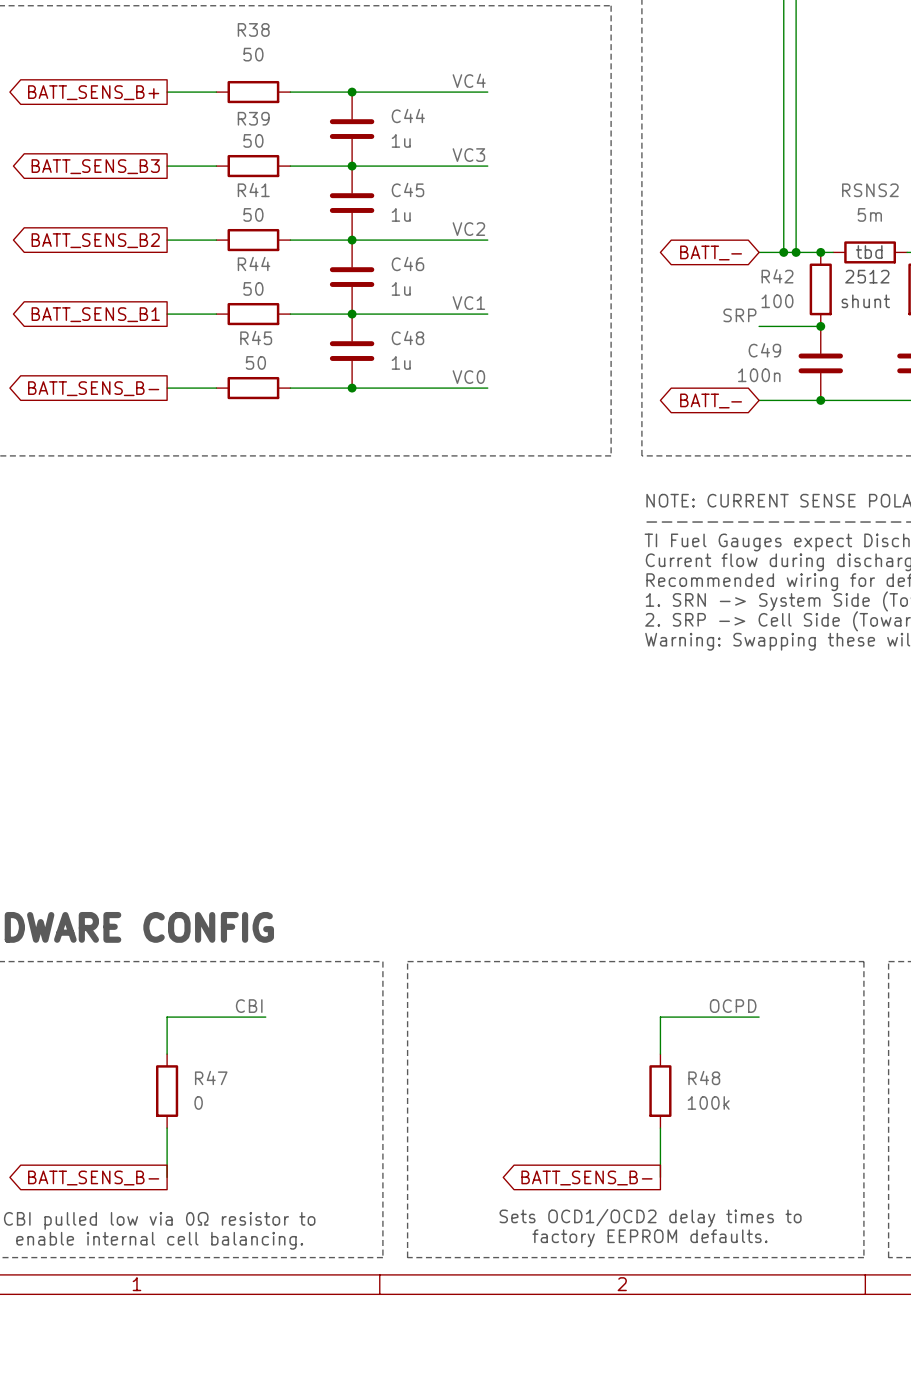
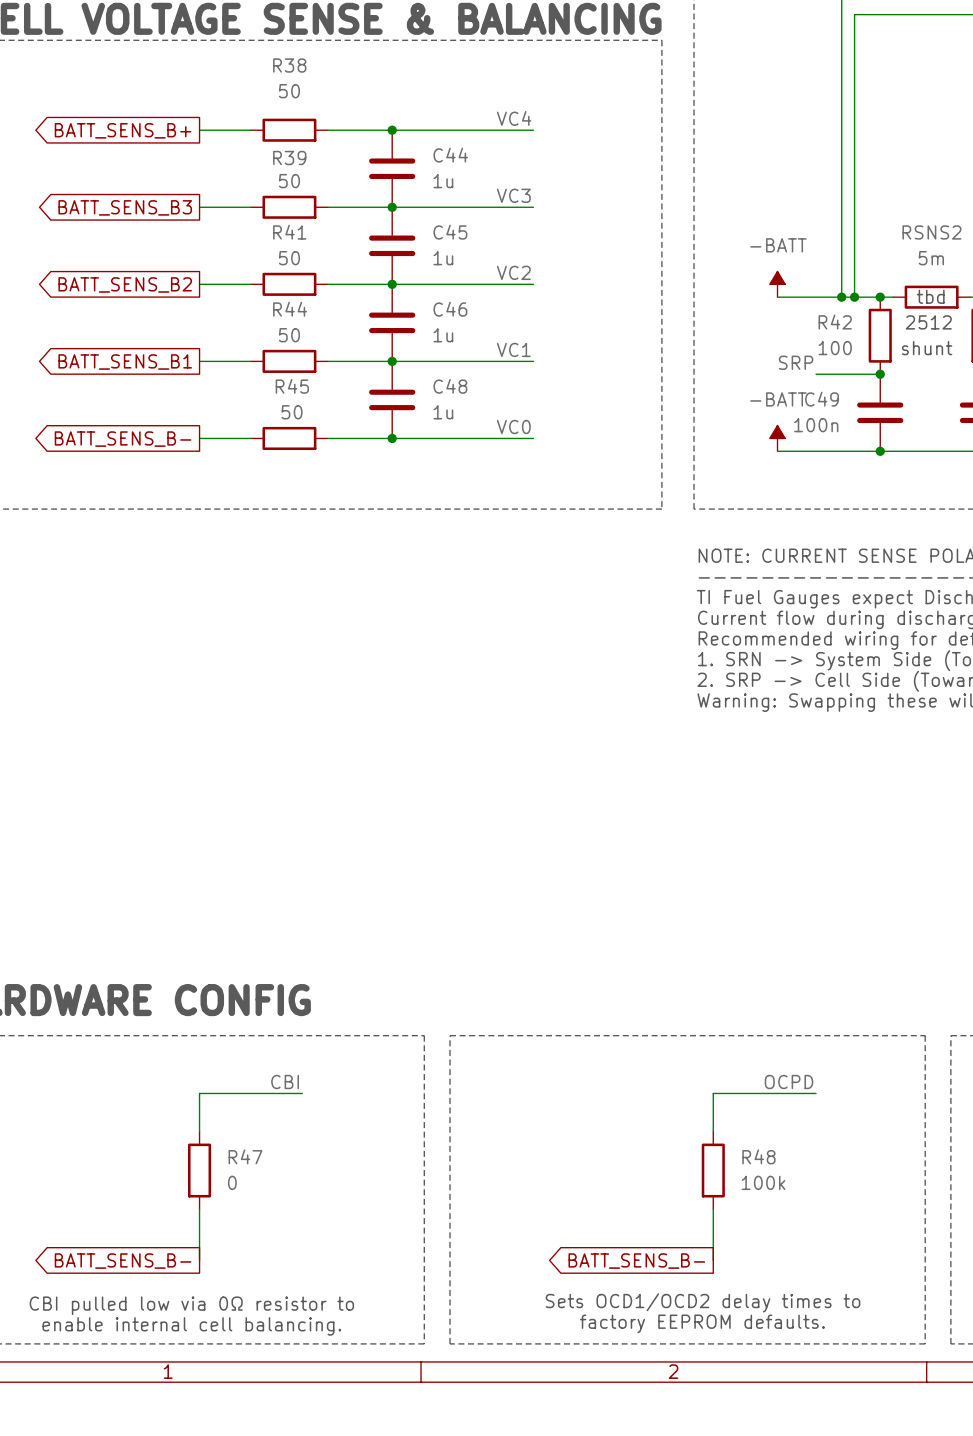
power symbol: none -> -BATT (777, 284)
global label: BATT_- (711, 252) -> none
wire: none -> (777, 297) (816, 297)
power symbol: none -> -BATT (777, 438)
wire: none -> (777, 451) (816, 451)
global label: BATT_- (711, 401) -> none

